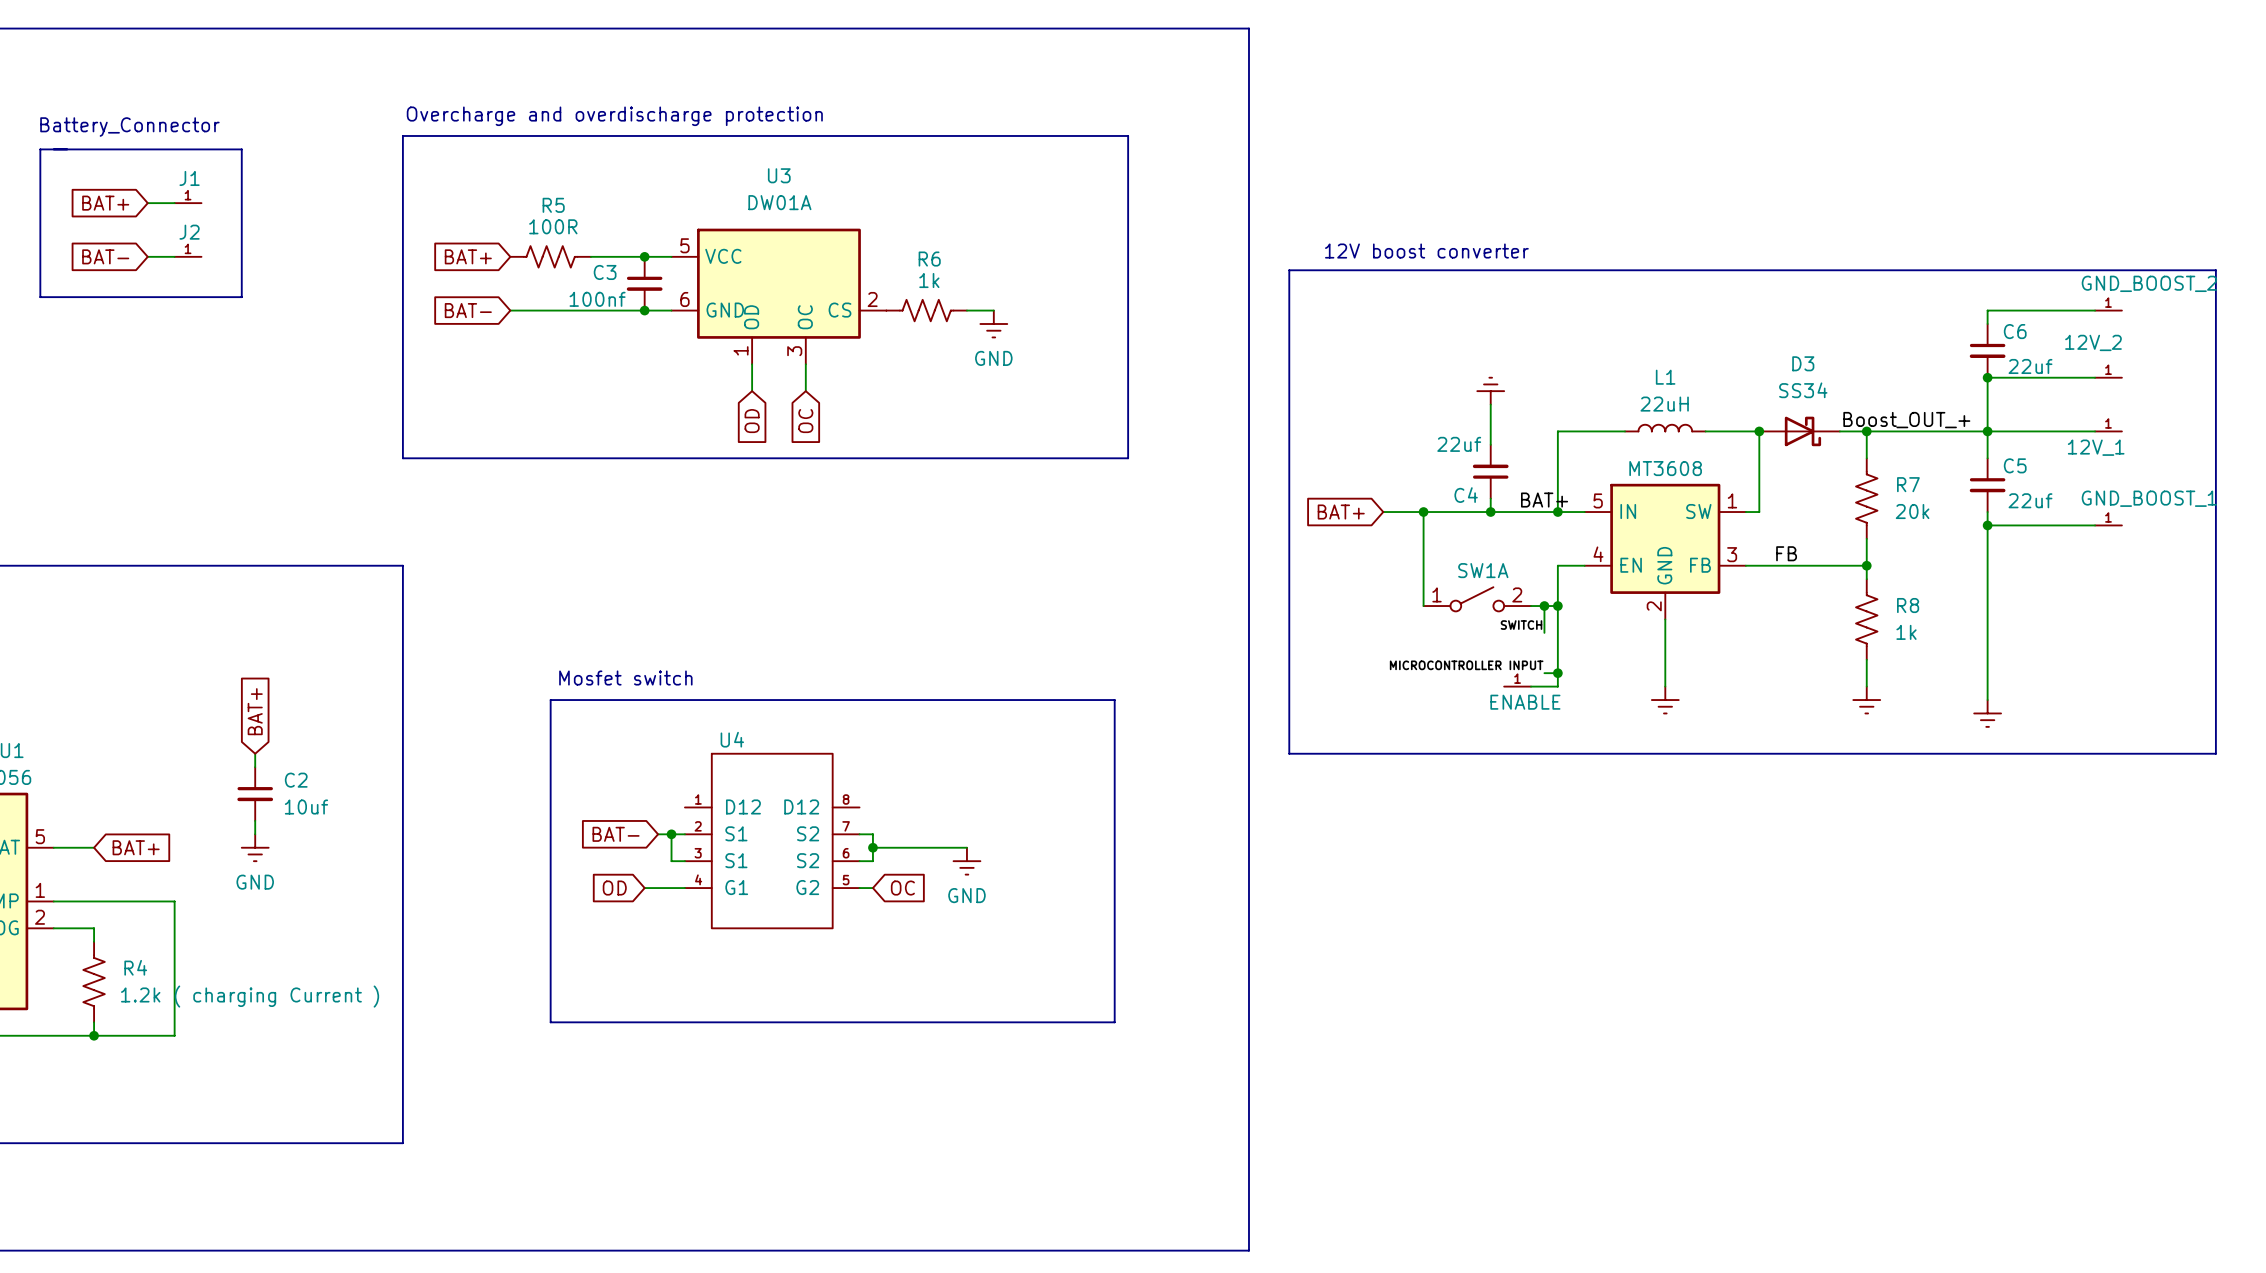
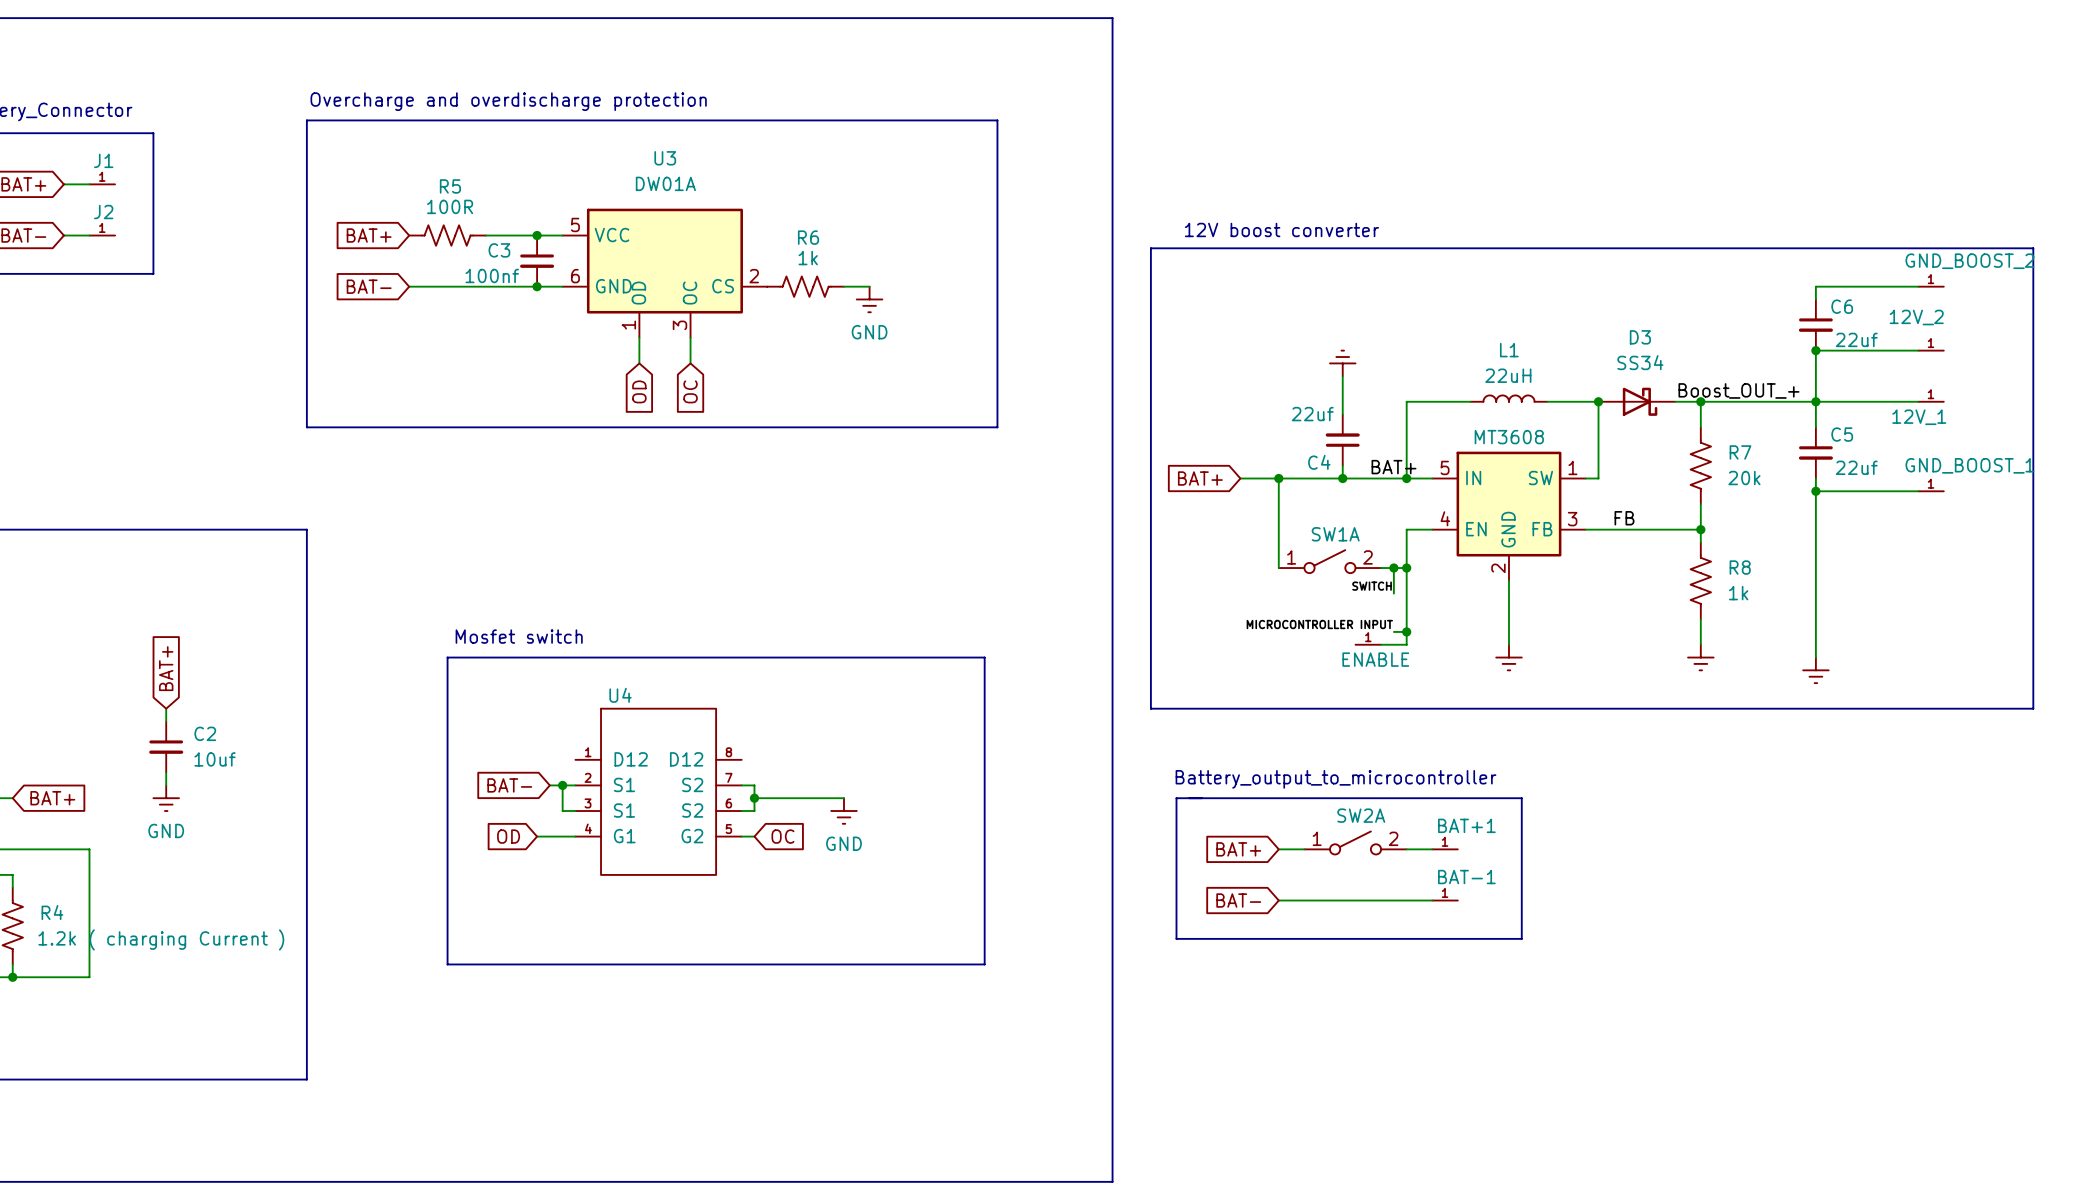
text: none -> Battery_output_to_microcontroller (1335, 779)
line: none -> (1176, 798) (1521, 798) (1521, 938) (1176, 938) (1176, 798)
SW2A: none -> (1355, 842)
global label: none -> BAT+ (1238, 849)
wire: none -> (1278, 849) (1304, 849)
wire: none -> (1406, 849) (1432, 849)
BAT+1: none -> (1445, 849)
global label: none -> BAT- (1238, 900)
wire: none -> (1278, 900) (1432, 900)
BAT-1: none -> (1445, 900)

